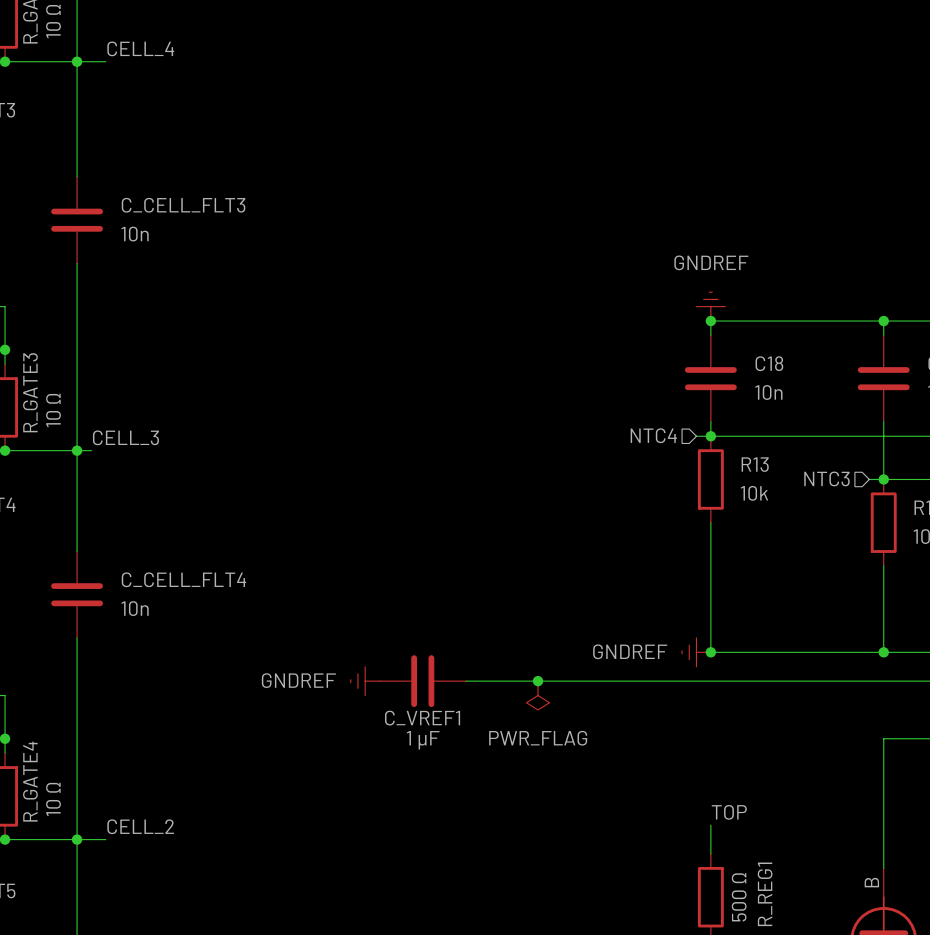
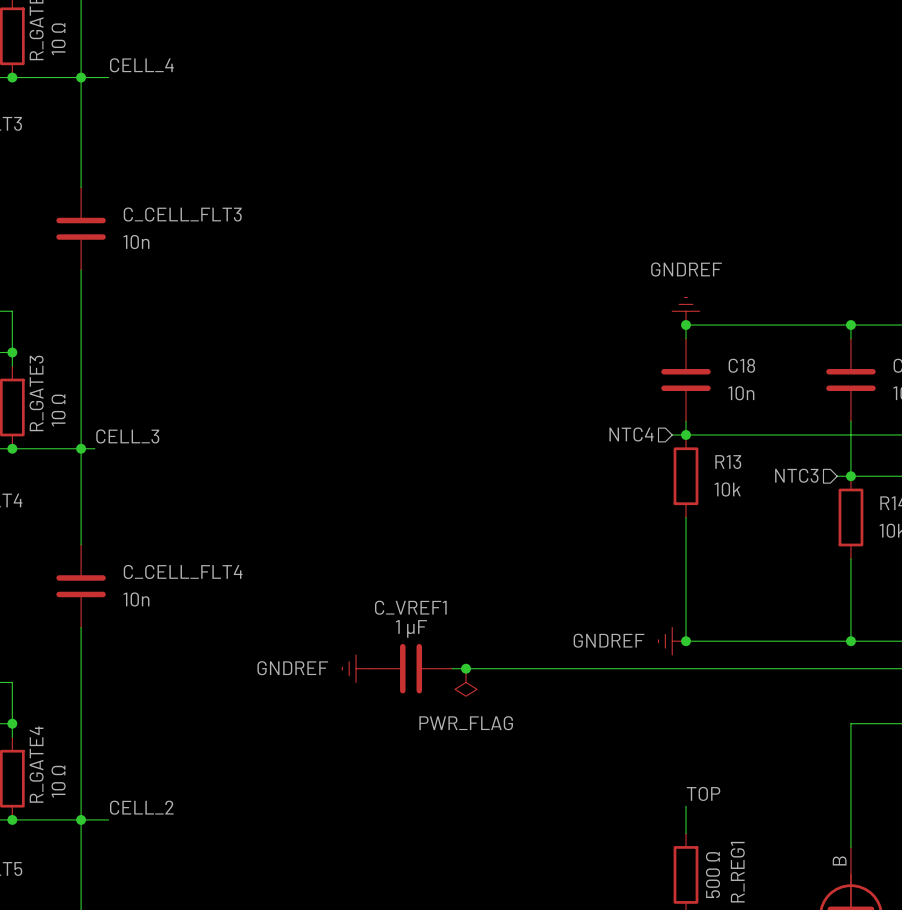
junction position: (538, 681) -> (466, 668)
power symbol position: PWR_FLAG (538, 695) -> PWR_FLAG (466, 682)
C_VREF1 name position: C_VREF1 (422, 718) -> C_VREF1 (410, 607)
C_VREF1 value position: 1 μF (423, 740) -> 1 μF (411, 628)

